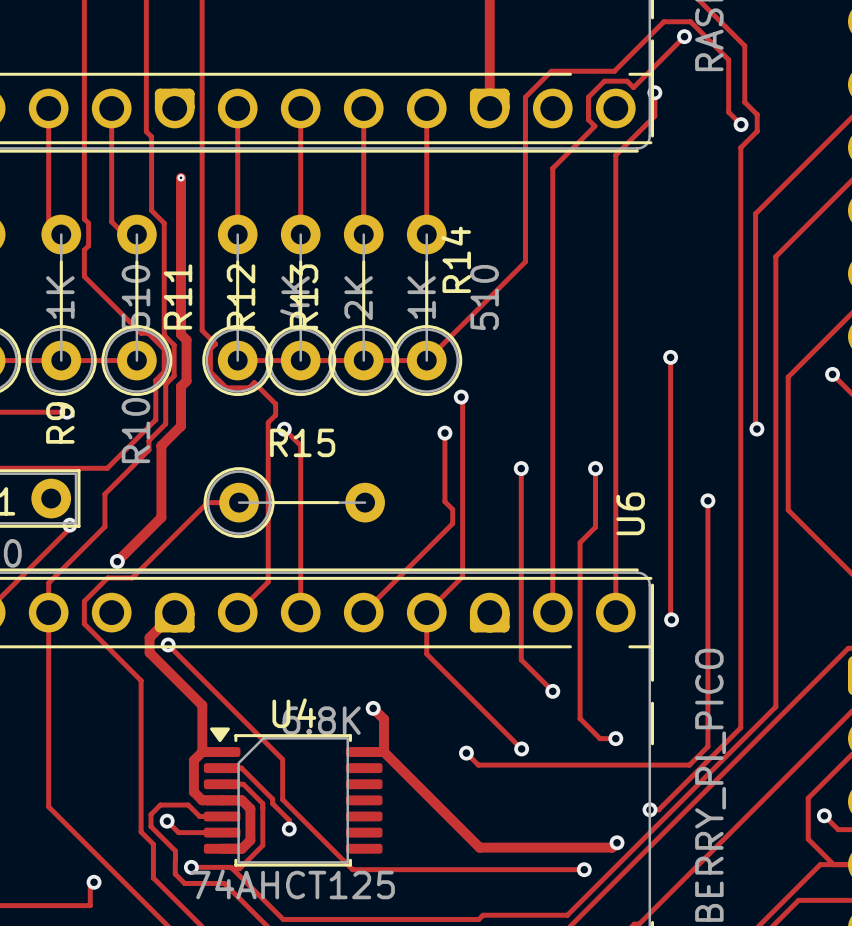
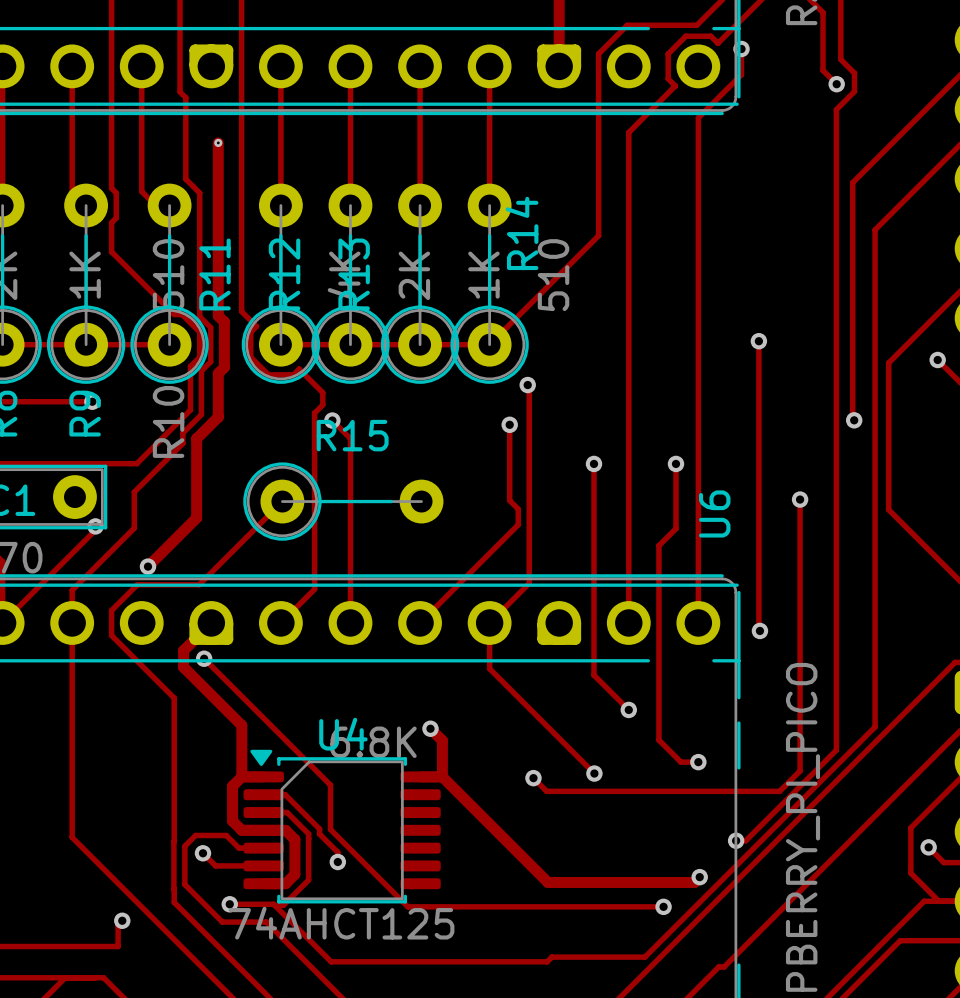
track: (239, 502) (207, 502) (132, 577) -> (282, 501) (199, 584) (164, 584)
track: (141, 810) (141, 831) (153, 844) (153, 878) -> (173, 841) (173, 889)
track: (151, 814) (151, 826) (175, 851) (175, 860) -> (184, 846) (184, 884) (211, 911)
track: none -> (174, 889) (174, 902) (187, 916)
track: (175, 860) (175, 874) -> none

